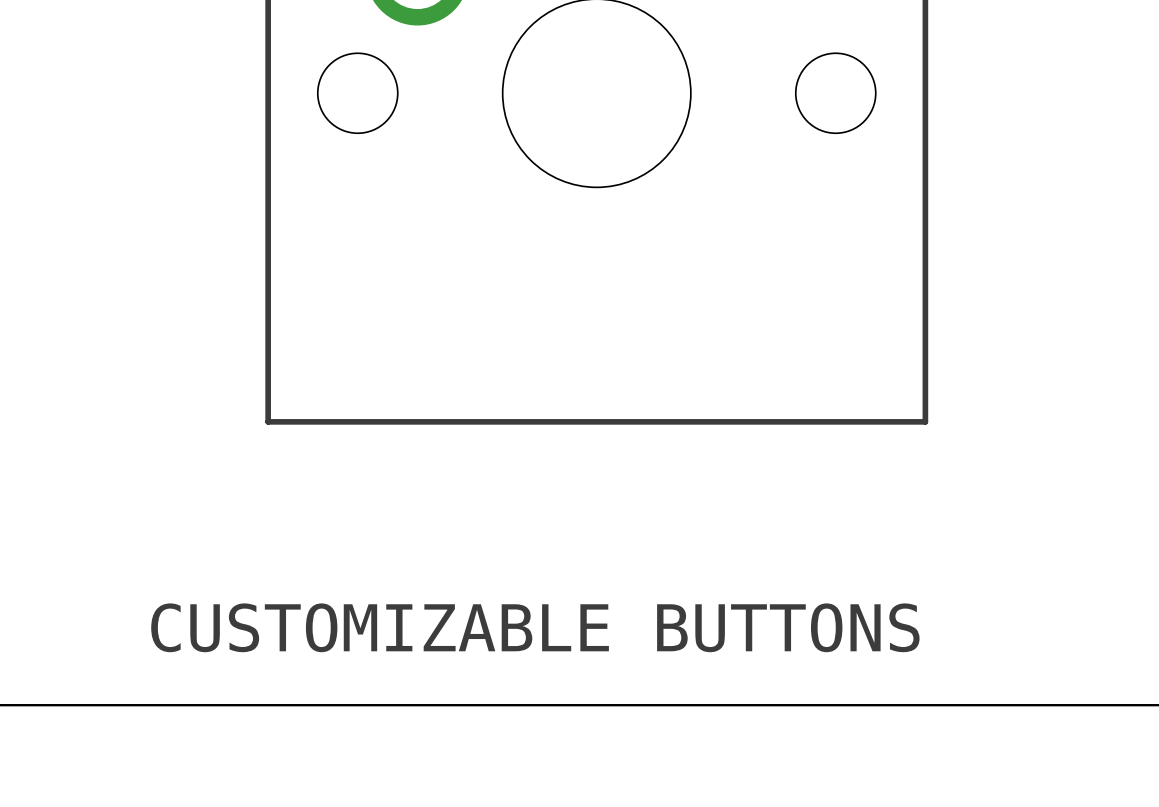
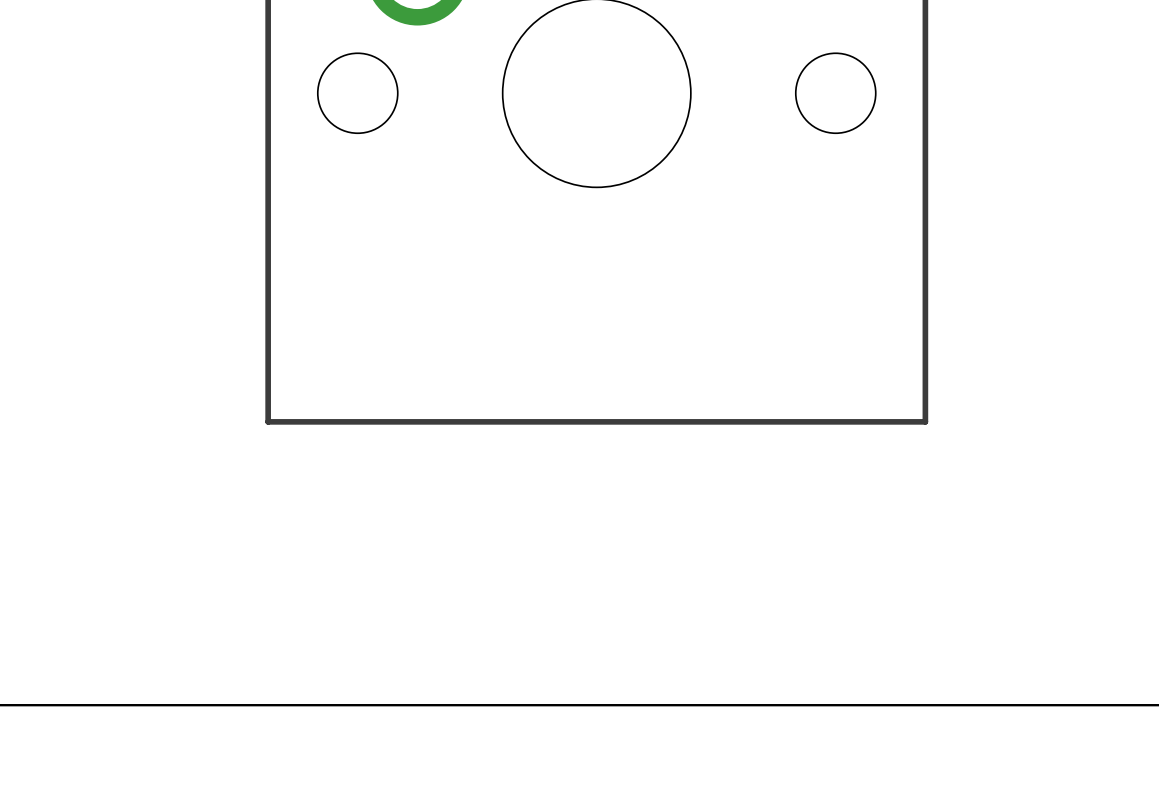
text: CUSTOMIZABLE BUTTONS (535, 627) -> none

